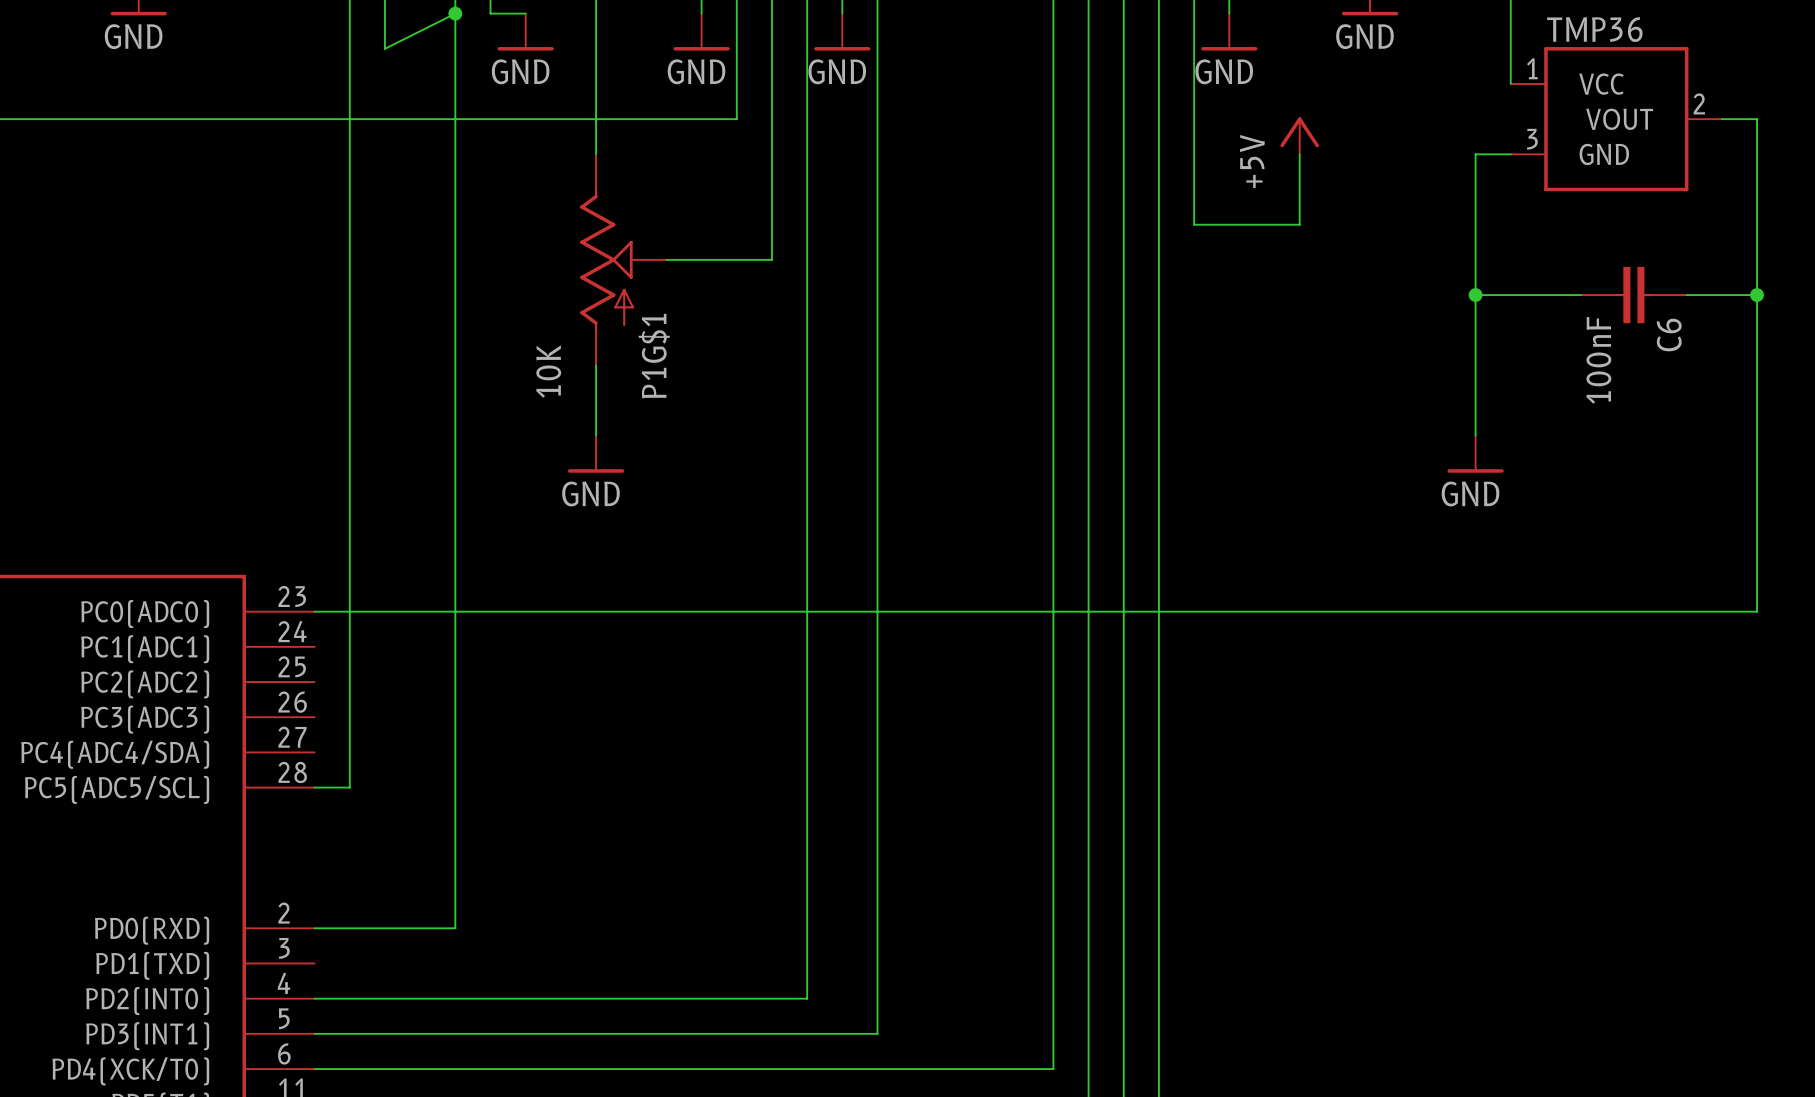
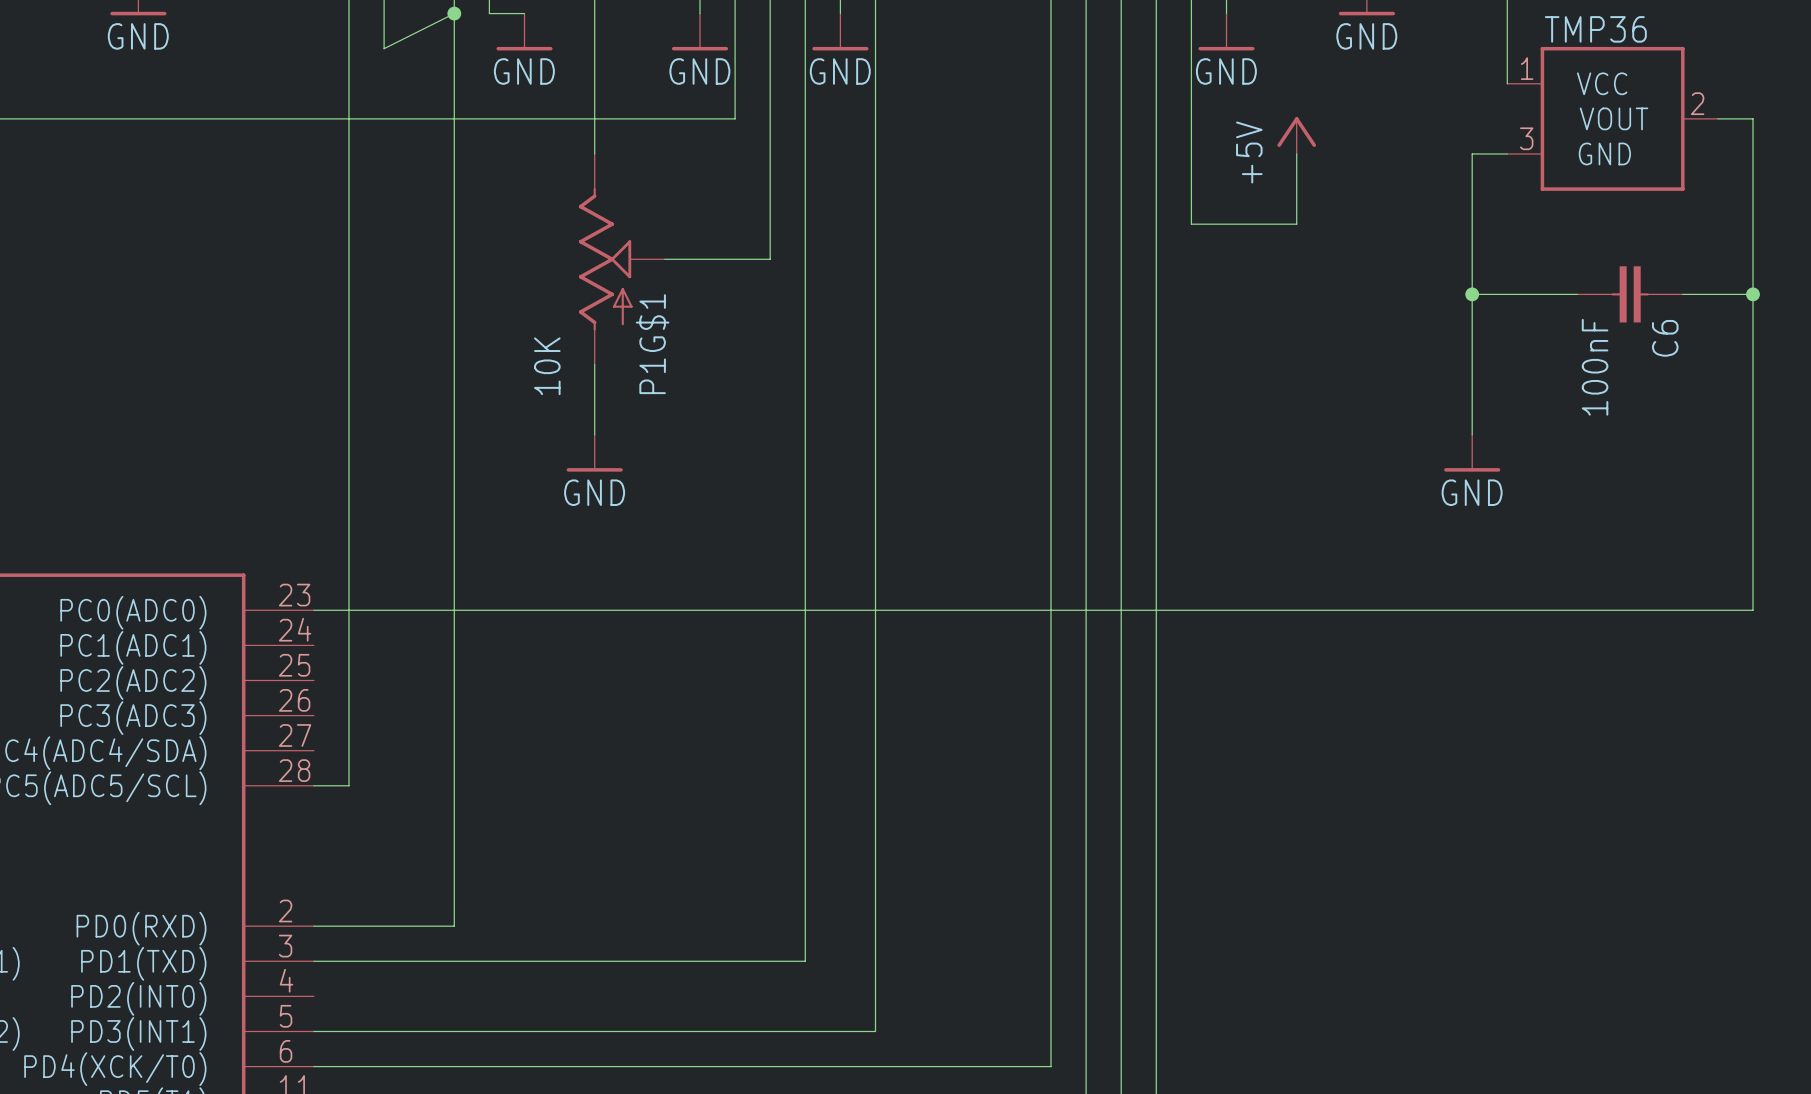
wire: (807, 963) (807, 998) (314, 998) -> (805, 961) (313, 961)

